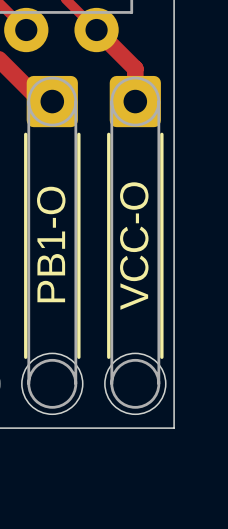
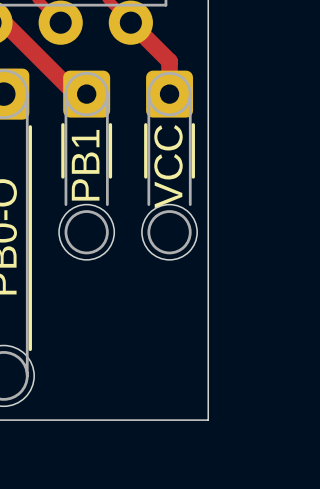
PB1: none -> (86, 165)
VCC: none -> (169, 165)
part: PB1-O (52, 245) -> none
part: VCC-O (135, 245) -> none

